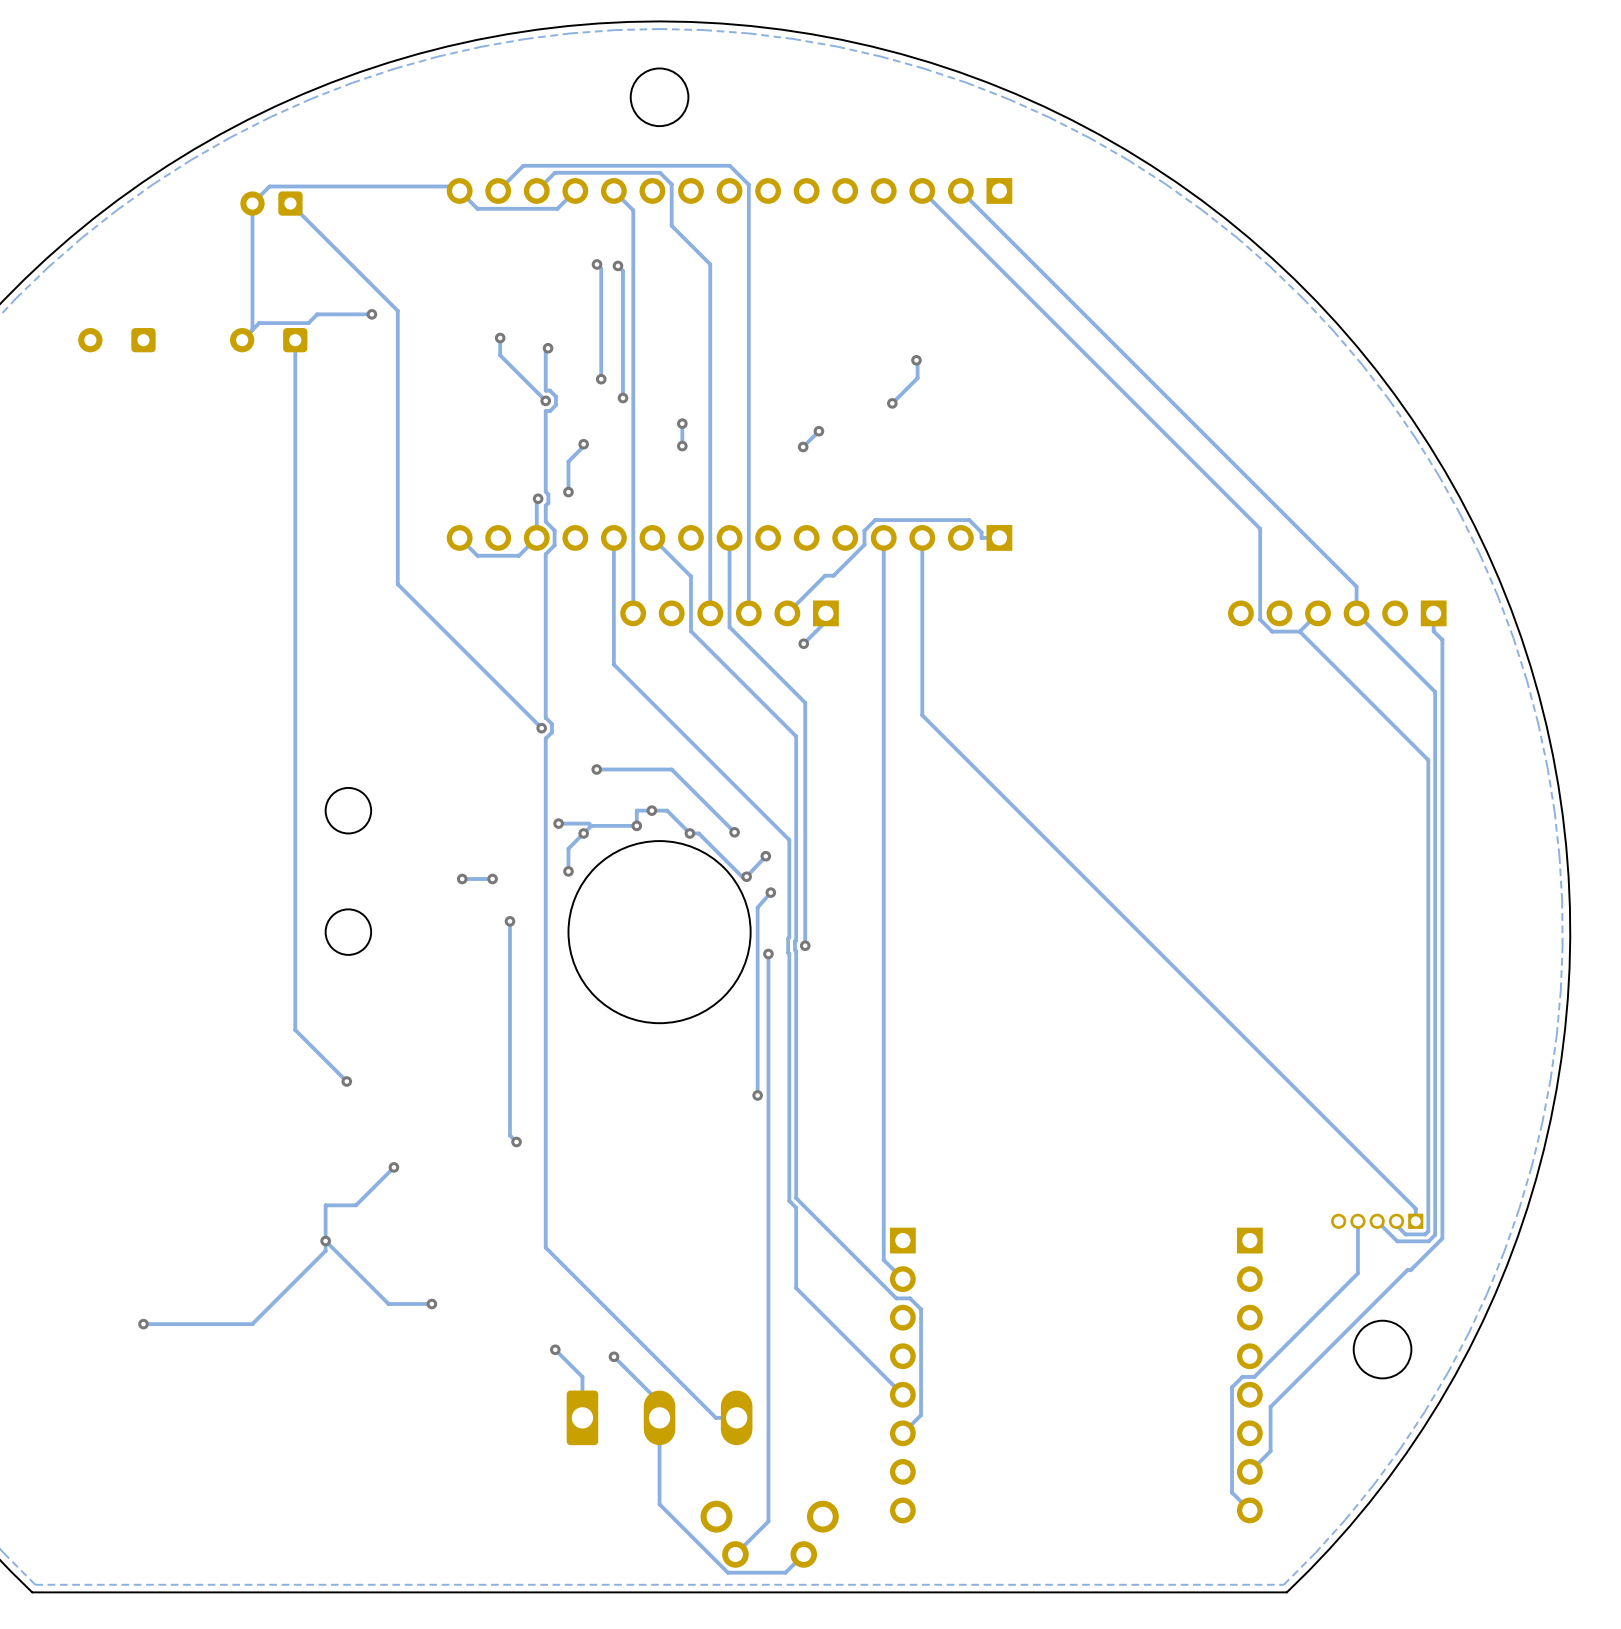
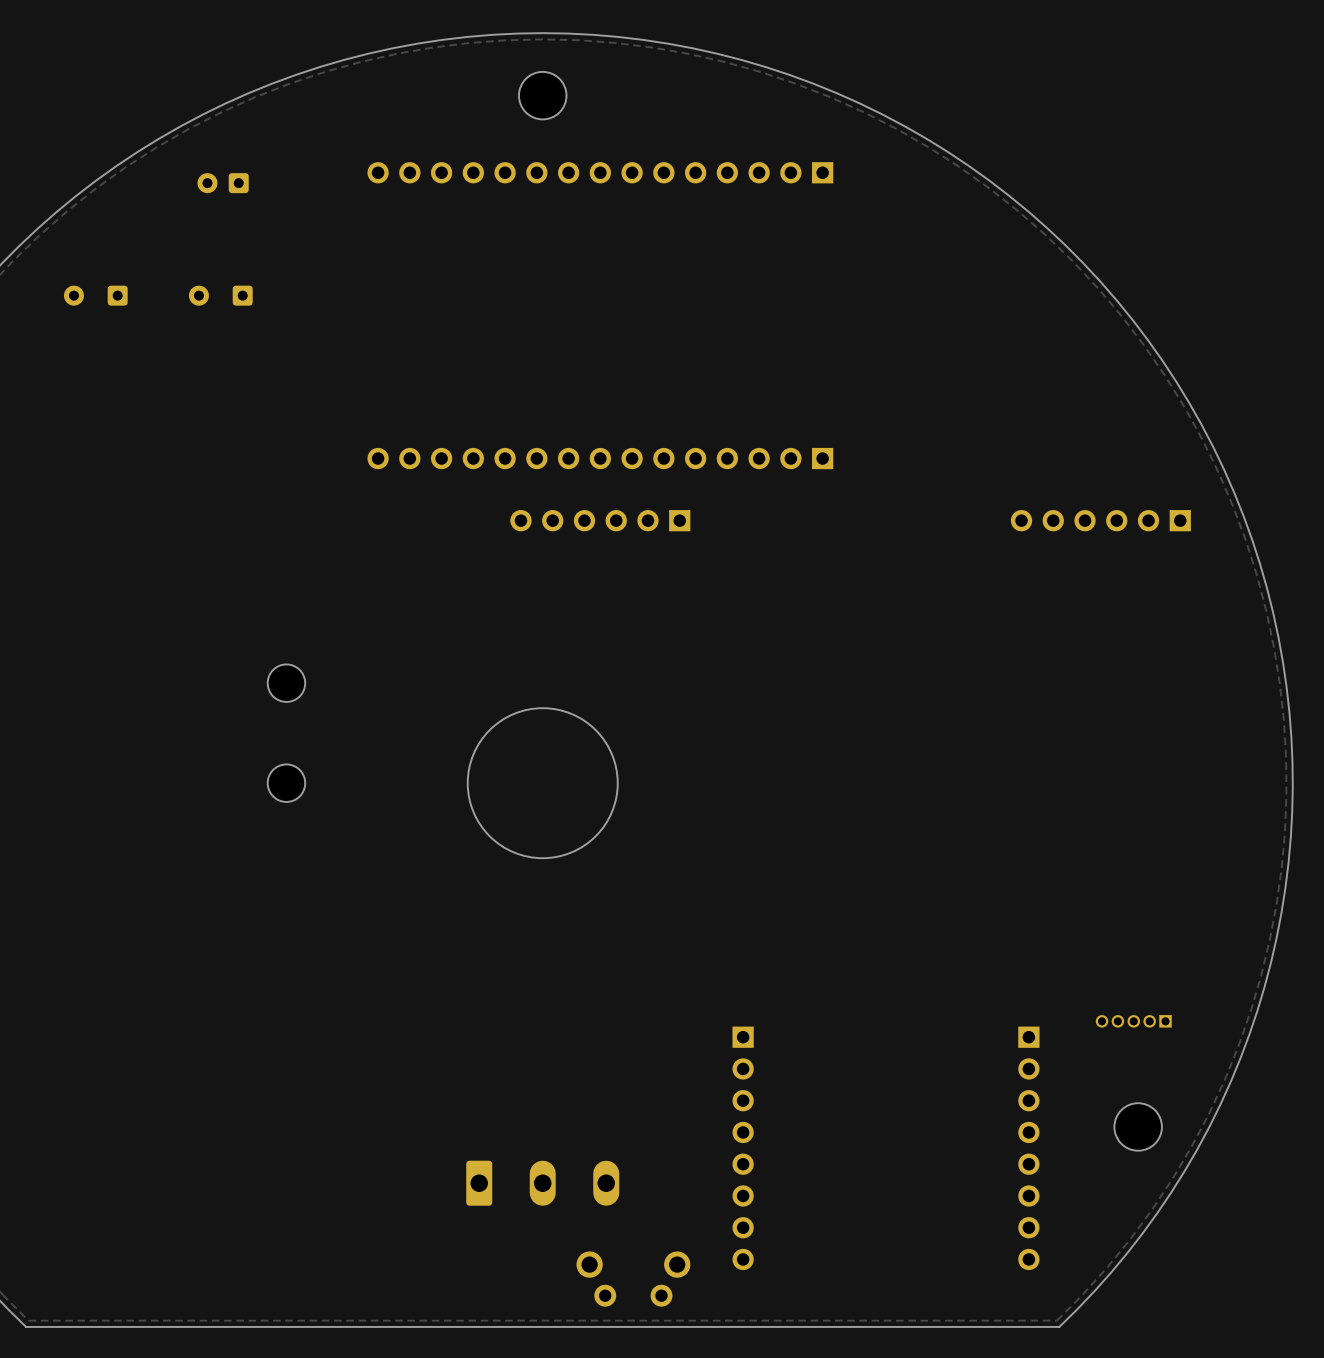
track: (498, 190) (523, 165) (729, 165) (748, 184) (748, 613) -> none
track: (536, 190) (554, 172) (660, 172) (671, 184) (671, 225) (710, 264) (710, 613) -> none
track: (575, 190) (557, 208) (477, 208) (455, 186) (269, 186) (252, 203) (252, 329) -> none
track: (613, 190) (633, 210) (633, 613) -> none
track: (922, 190) (1260, 528) (1260, 619) (1272, 631) (1299, 631) -> none
track: (960, 190) (1356, 586) (1356, 613) (1435, 691) (1435, 1234) (1428, 1241) (1397, 1241) (1377, 1221) -> none
track: (290, 203) (397, 310) (397, 584) (541, 728) -> none
track: (597, 264) (601, 268) (601, 379) -> none
via: (597, 264) -> none
track: (617, 265) (623, 270) (623, 398) -> none
via: (617, 265) -> none
track: (371, 314) (317, 314) (308, 323) (259, 323) (242, 340) -> none
via: (371, 314) -> none
track: (500, 338) (500, 355) (545, 400) -> none
via: (500, 338) -> none
track: (295, 340) (295, 1030) (346, 1081) -> none
track: (548, 348) (545, 350) (545, 390) (549, 390) (555, 396) (555, 405) (549, 411) (545, 411) (545, 491) (548, 494) (548, 503) (545, 505) (545, 521) (554, 530) (554, 545) (545, 554) (545, 717) -> none
via: (548, 348) -> none
track: (916, 360) (917, 378) (892, 403) -> none
via: (916, 360) -> none
via: (601, 379) -> none
via: (623, 398) -> none
via: (545, 400) -> none
via: (892, 403) -> none
track: (682, 423) (682, 446) -> none
via: (682, 423) -> none
track: (818, 431) (803, 447) -> none
via: (818, 431) -> none
via: (583, 444) -> none
track: (583, 446) (568, 461) (568, 492) -> none
via: (682, 446) -> none
via: (803, 447) -> none
via: (568, 492) -> none
track: (538, 498) (536, 537) (518, 555) (477, 555) (459, 537) -> none
via: (538, 498) -> none
track: (613, 537) (613, 664) (789, 839) (789, 1200) (796, 1207) (796, 1288) (902, 1394) -> none
track: (652, 537) (690, 576) (690, 631) (796, 736) (796, 1198) (896, 1298) (910, 1298) (921, 1309) (921, 1415) (902, 1433) -> none
track: (729, 537) (729, 627) (805, 702) (805, 945) -> none
track: (883, 537) (883, 1259) (902, 1279) -> none
track: (922, 537) (922, 715) (1415, 1208) (1415, 1221) -> none
track: (999, 537) (981, 537) (981, 532) (969, 520) (875, 520) (864, 530) (864, 544) (833, 575) (825, 575) (787, 613) -> none
track: (825, 613) (825, 621) (803, 643) -> none
track: (1318, 613) (1299, 631) -> none
track: (1433, 613) (1433, 631) (1442, 639) (1442, 1238) (1410, 1270) (1407, 1270) (1270, 1406) (1270, 1451) (1249, 1471) -> none
track: (1299, 631) (1428, 760) (1428, 1231) (1425, 1234) (1405, 1234) (1396, 1225) (1396, 1221) -> none
via: (803, 643) -> none
track: (545, 717) (551, 723) (551, 732) (545, 738) -> none
via: (541, 728) -> none
track: (545, 738) (545, 1247) (715, 1417) (736, 1417) -> none
track: (596, 769) (671, 769) (734, 832) -> none
via: (596, 769) -> none
track: (636, 810) (667, 810) (689, 833) (698, 833) (743, 878) -> none
track: (636, 810) (636, 825) (591, 825) -> none
via: (651, 810) -> none
track: (558, 823) (588, 823) (591, 825) -> none
via: (558, 823) -> none
track: (591, 825) (568, 848) (568, 871) -> none
via: (636, 825) -> none
via: (734, 832) -> none
via: (583, 833) -> none
via: (689, 833) -> none
track: (765, 856) (746, 876) -> none
via: (765, 856) -> none
via: (568, 871) -> none
via: (746, 876) -> none
via: (462, 879) -> none
track: (492, 879) (462, 879) -> none
via: (492, 879) -> none
track: (770, 892) (757, 907) (757, 1095) -> none
via: (770, 892) -> none
track: (509, 921) (509, 1135) (516, 1142) -> none
via: (509, 921) -> none
via: (805, 945) -> none
track: (768, 953) (768, 1521) (735, 1554) -> none
via: (768, 953) -> none
via: (346, 1081) -> none
via: (757, 1095) -> none
via: (516, 1142) -> none
track: (393, 1167) (355, 1205) (325, 1205) (325, 1250) (252, 1324) (143, 1324) -> none
via: (393, 1167) -> none
track: (1357, 1221) (1357, 1273) (1254, 1376) (1242, 1376) (1232, 1387) (1232, 1492) (1249, 1510) -> none
track: (325, 1241) (388, 1304) (431, 1304) -> none
via: (325, 1241) -> none
via: (431, 1304) -> none
via: (143, 1324) -> none
track: (555, 1349) (582, 1376) (582, 1417) -> none
via: (555, 1349) -> none
track: (614, 1356) (659, 1402) (659, 1504) (727, 1572) (785, 1572) (803, 1554) -> none
via: (614, 1356) -> none

